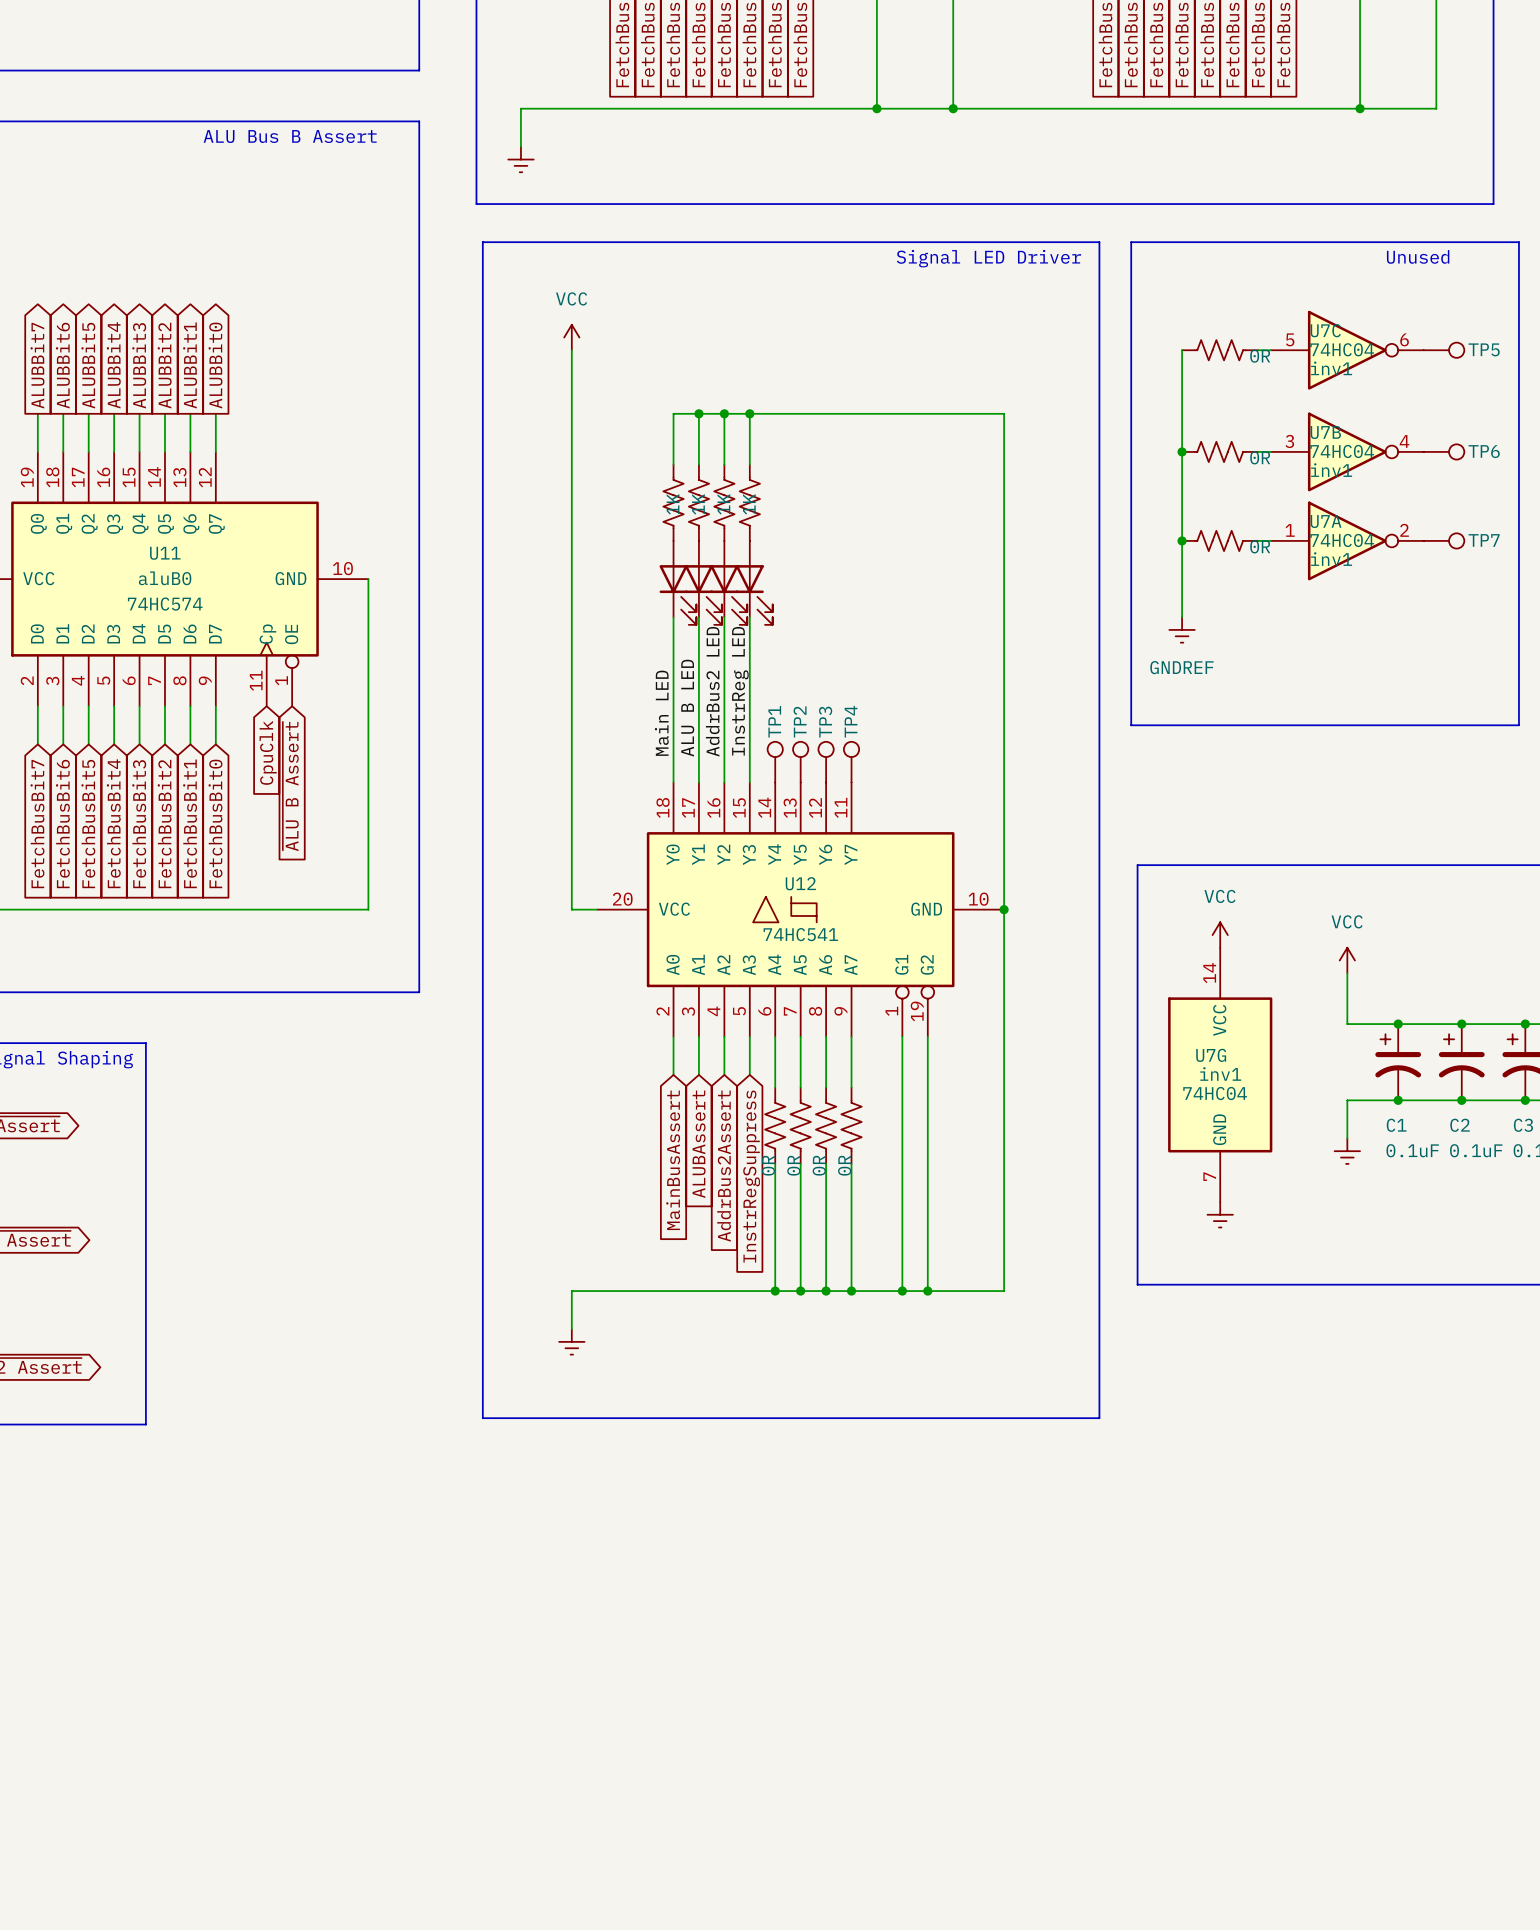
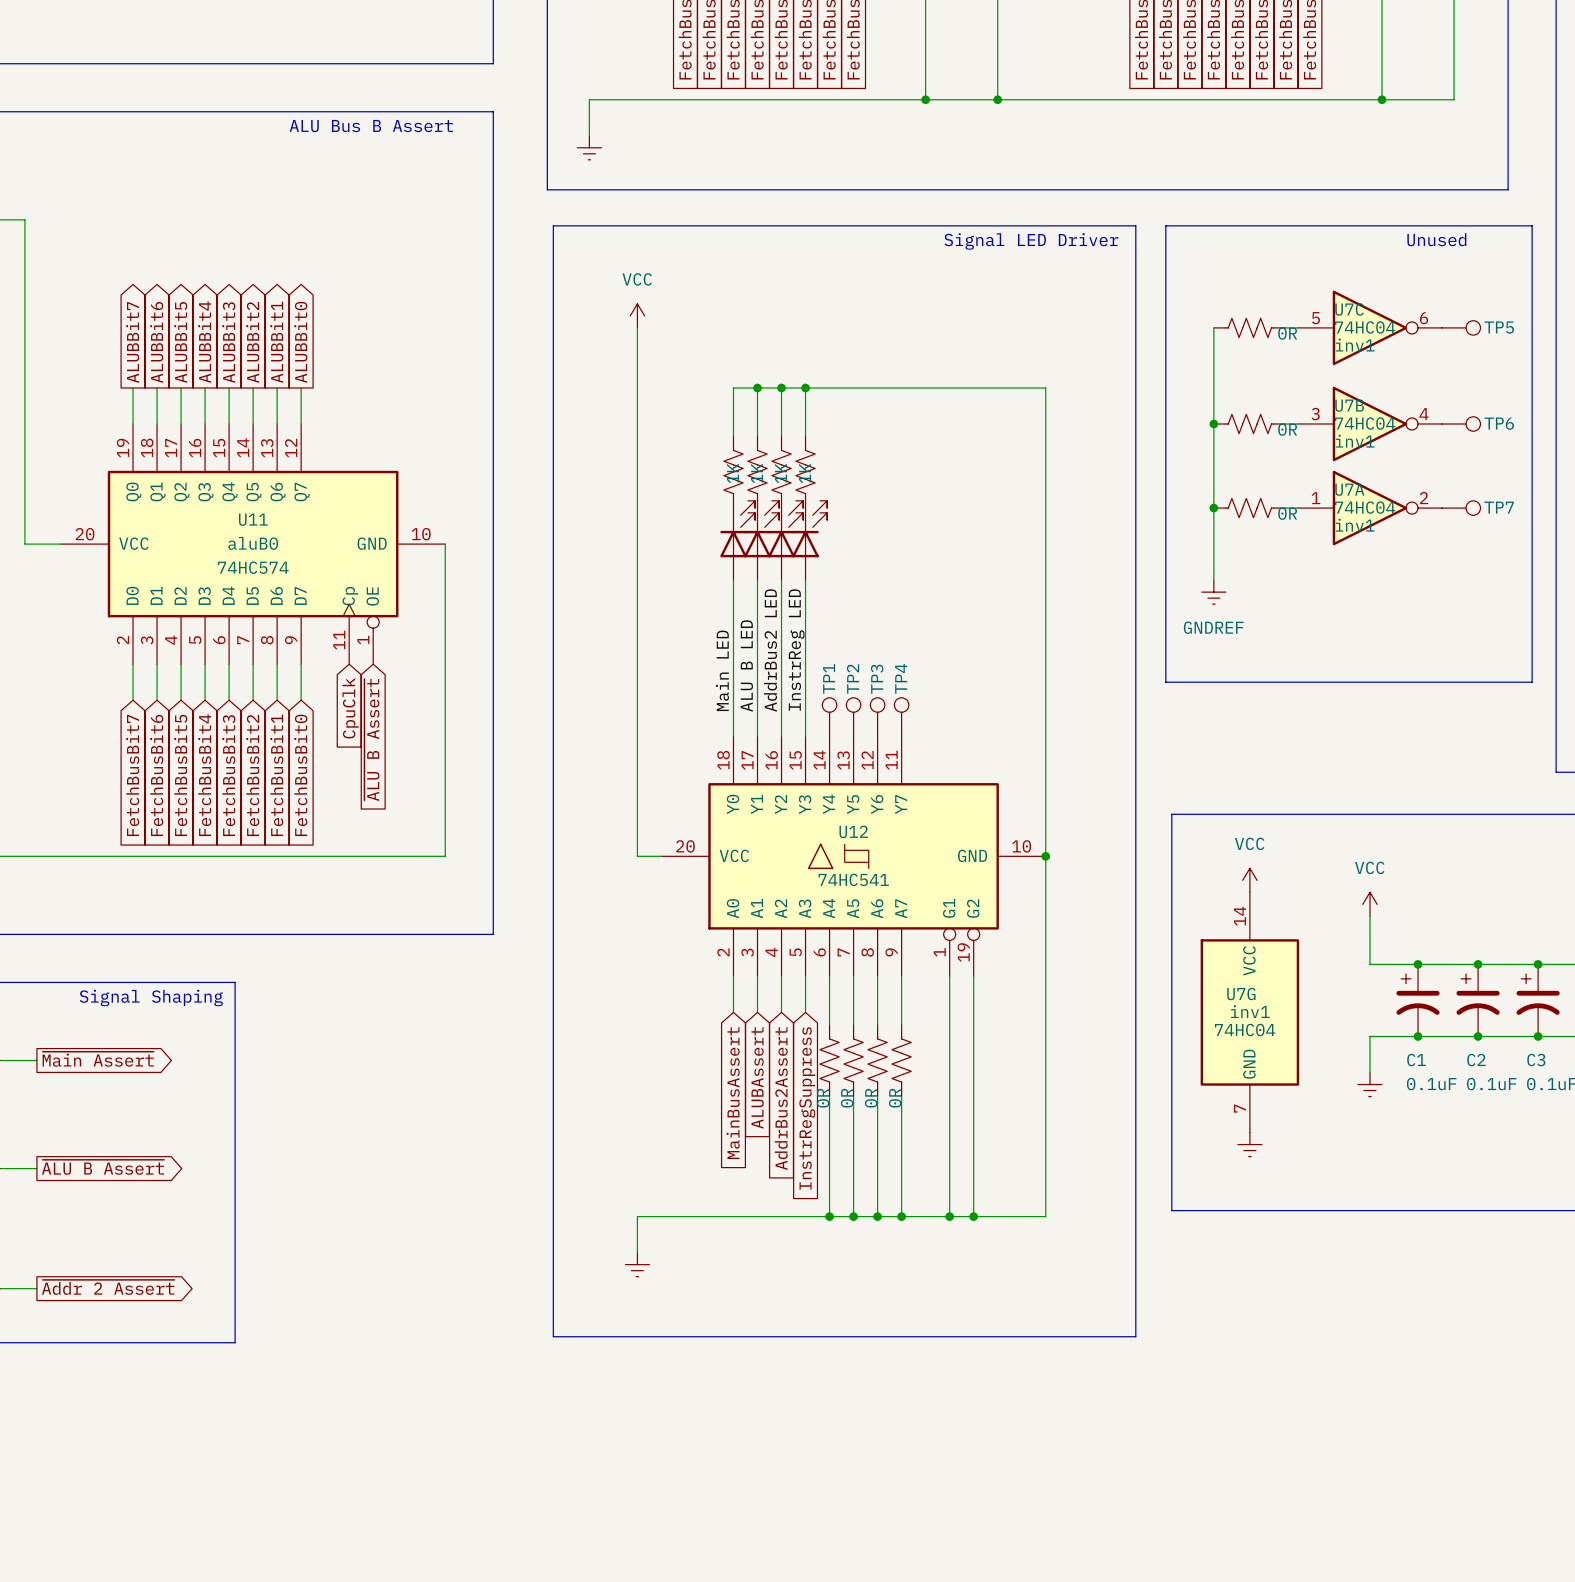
part flip: as is (677, 594) -> up-down (737, 529)
part flip: as is (703, 594) -> up-down (761, 529)
part flip: as is (728, 594) -> up-down (785, 529)
part flip: as is (754, 594) -> up-down (809, 529)

